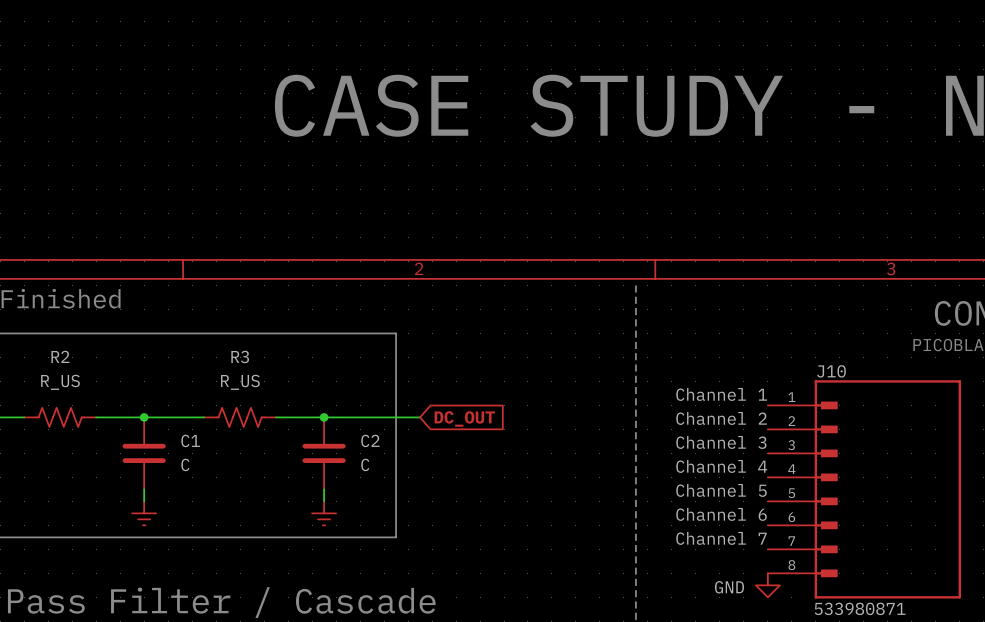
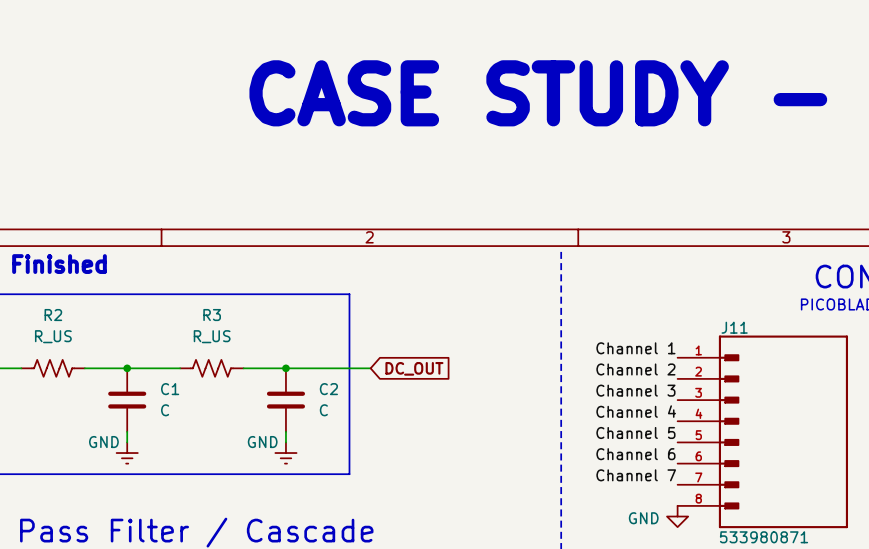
J10 name: J10 (831, 371) -> J11 (734, 327)
power symbol text: none -> GND (103, 442)
power symbol text: none -> GND (262, 442)

